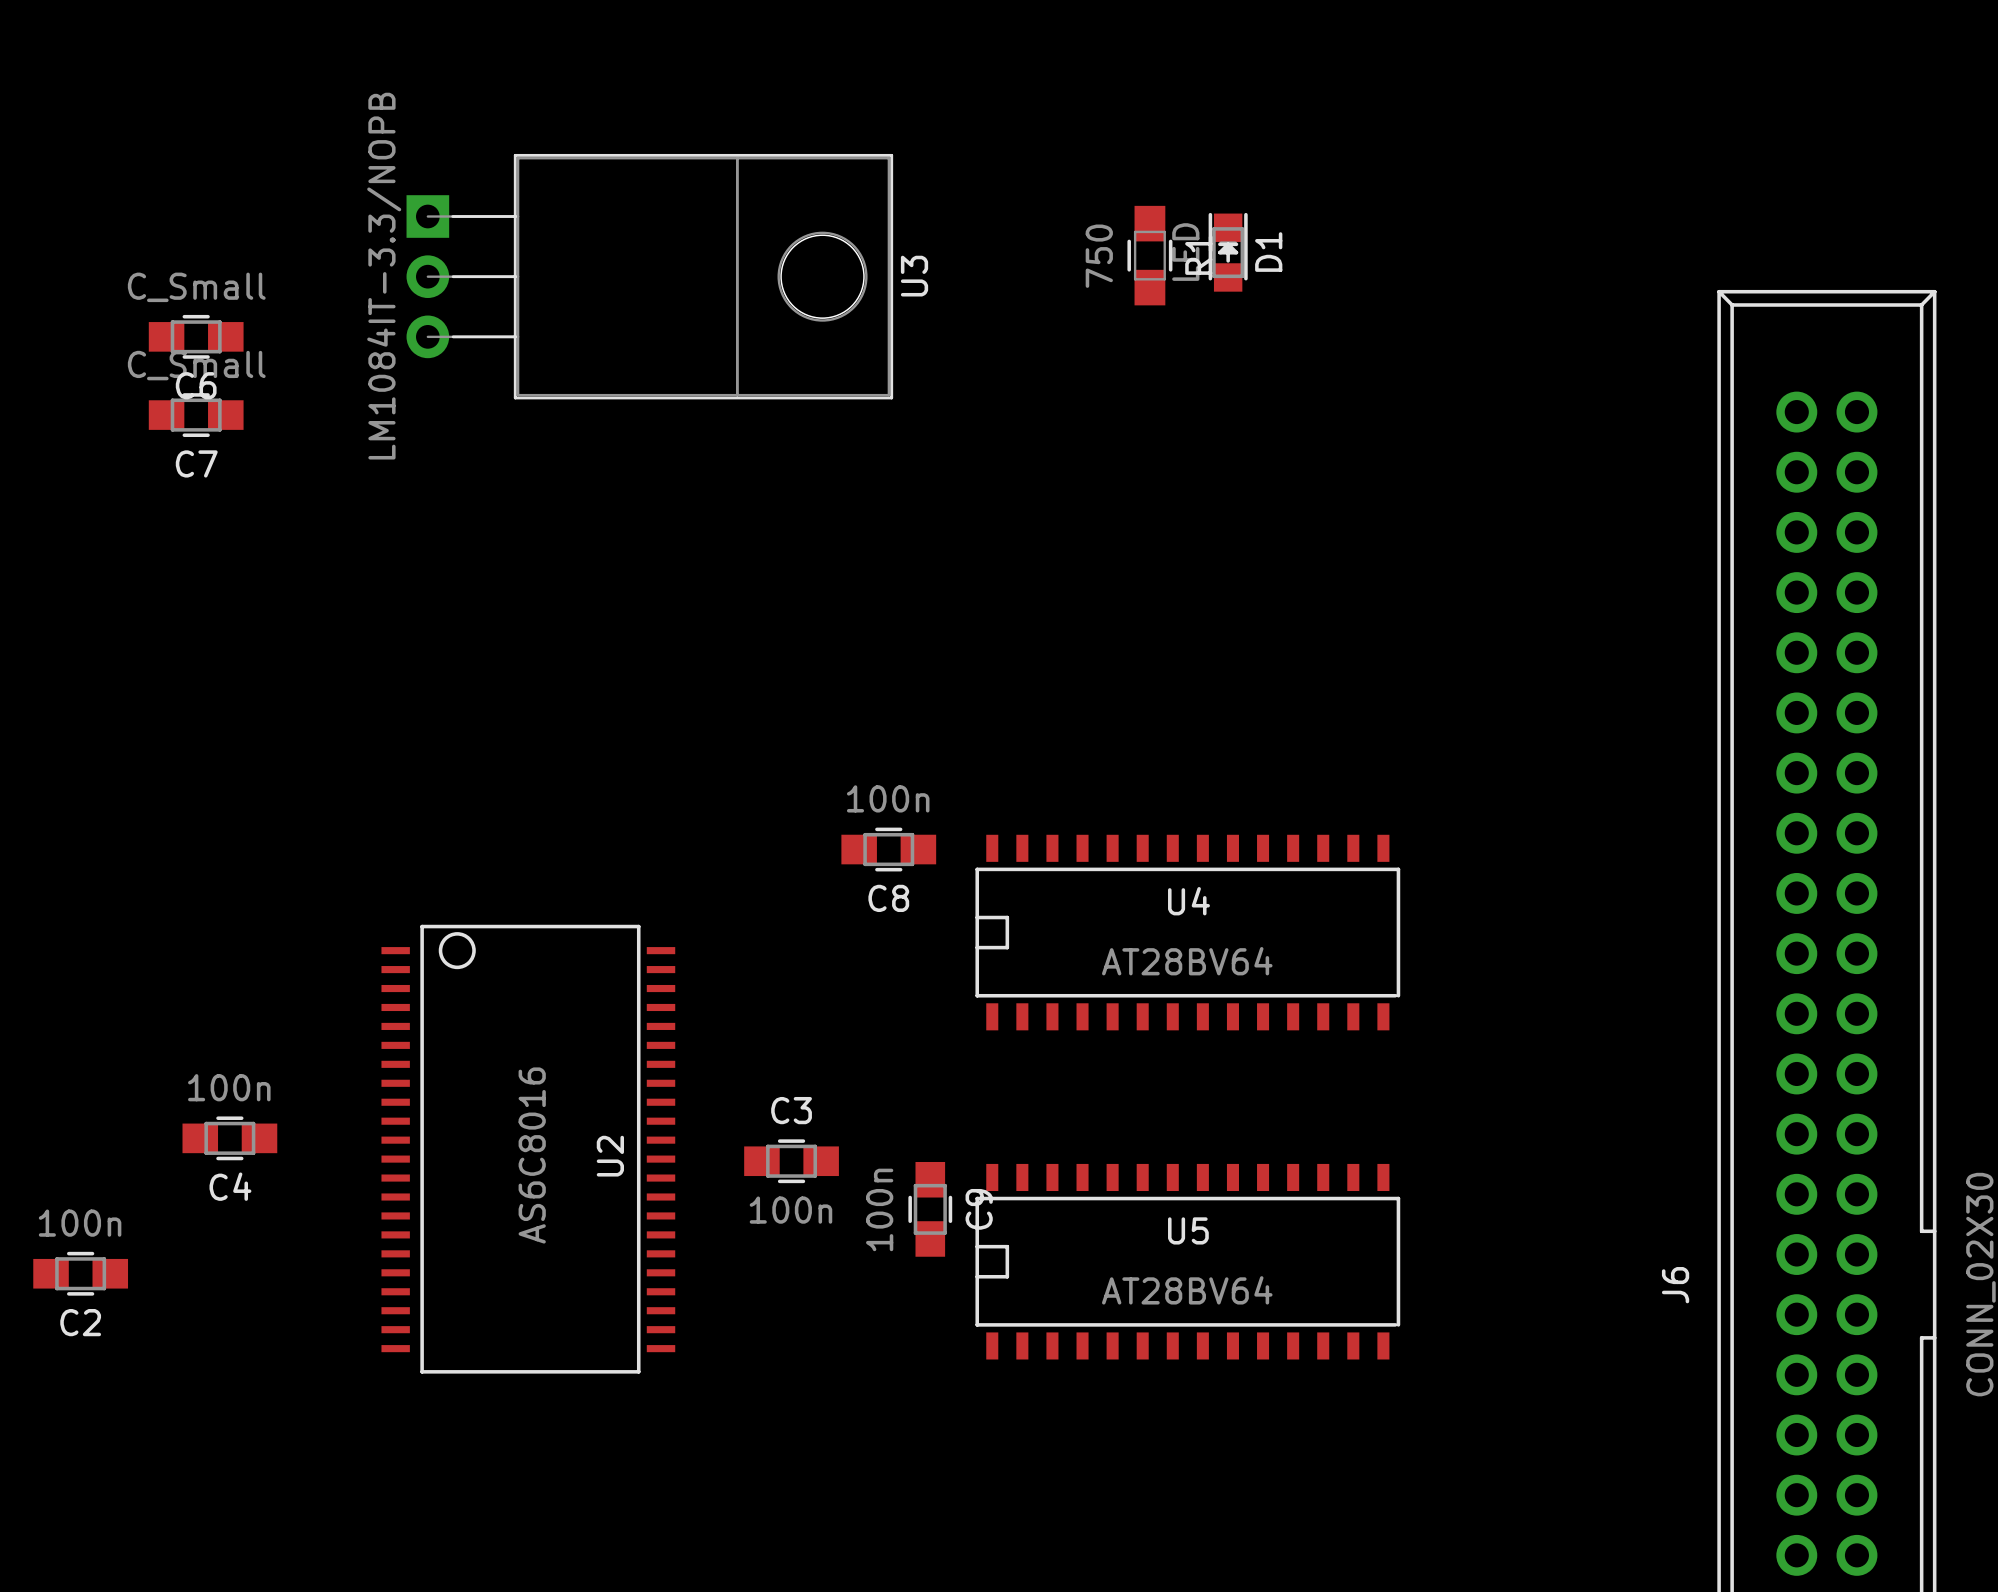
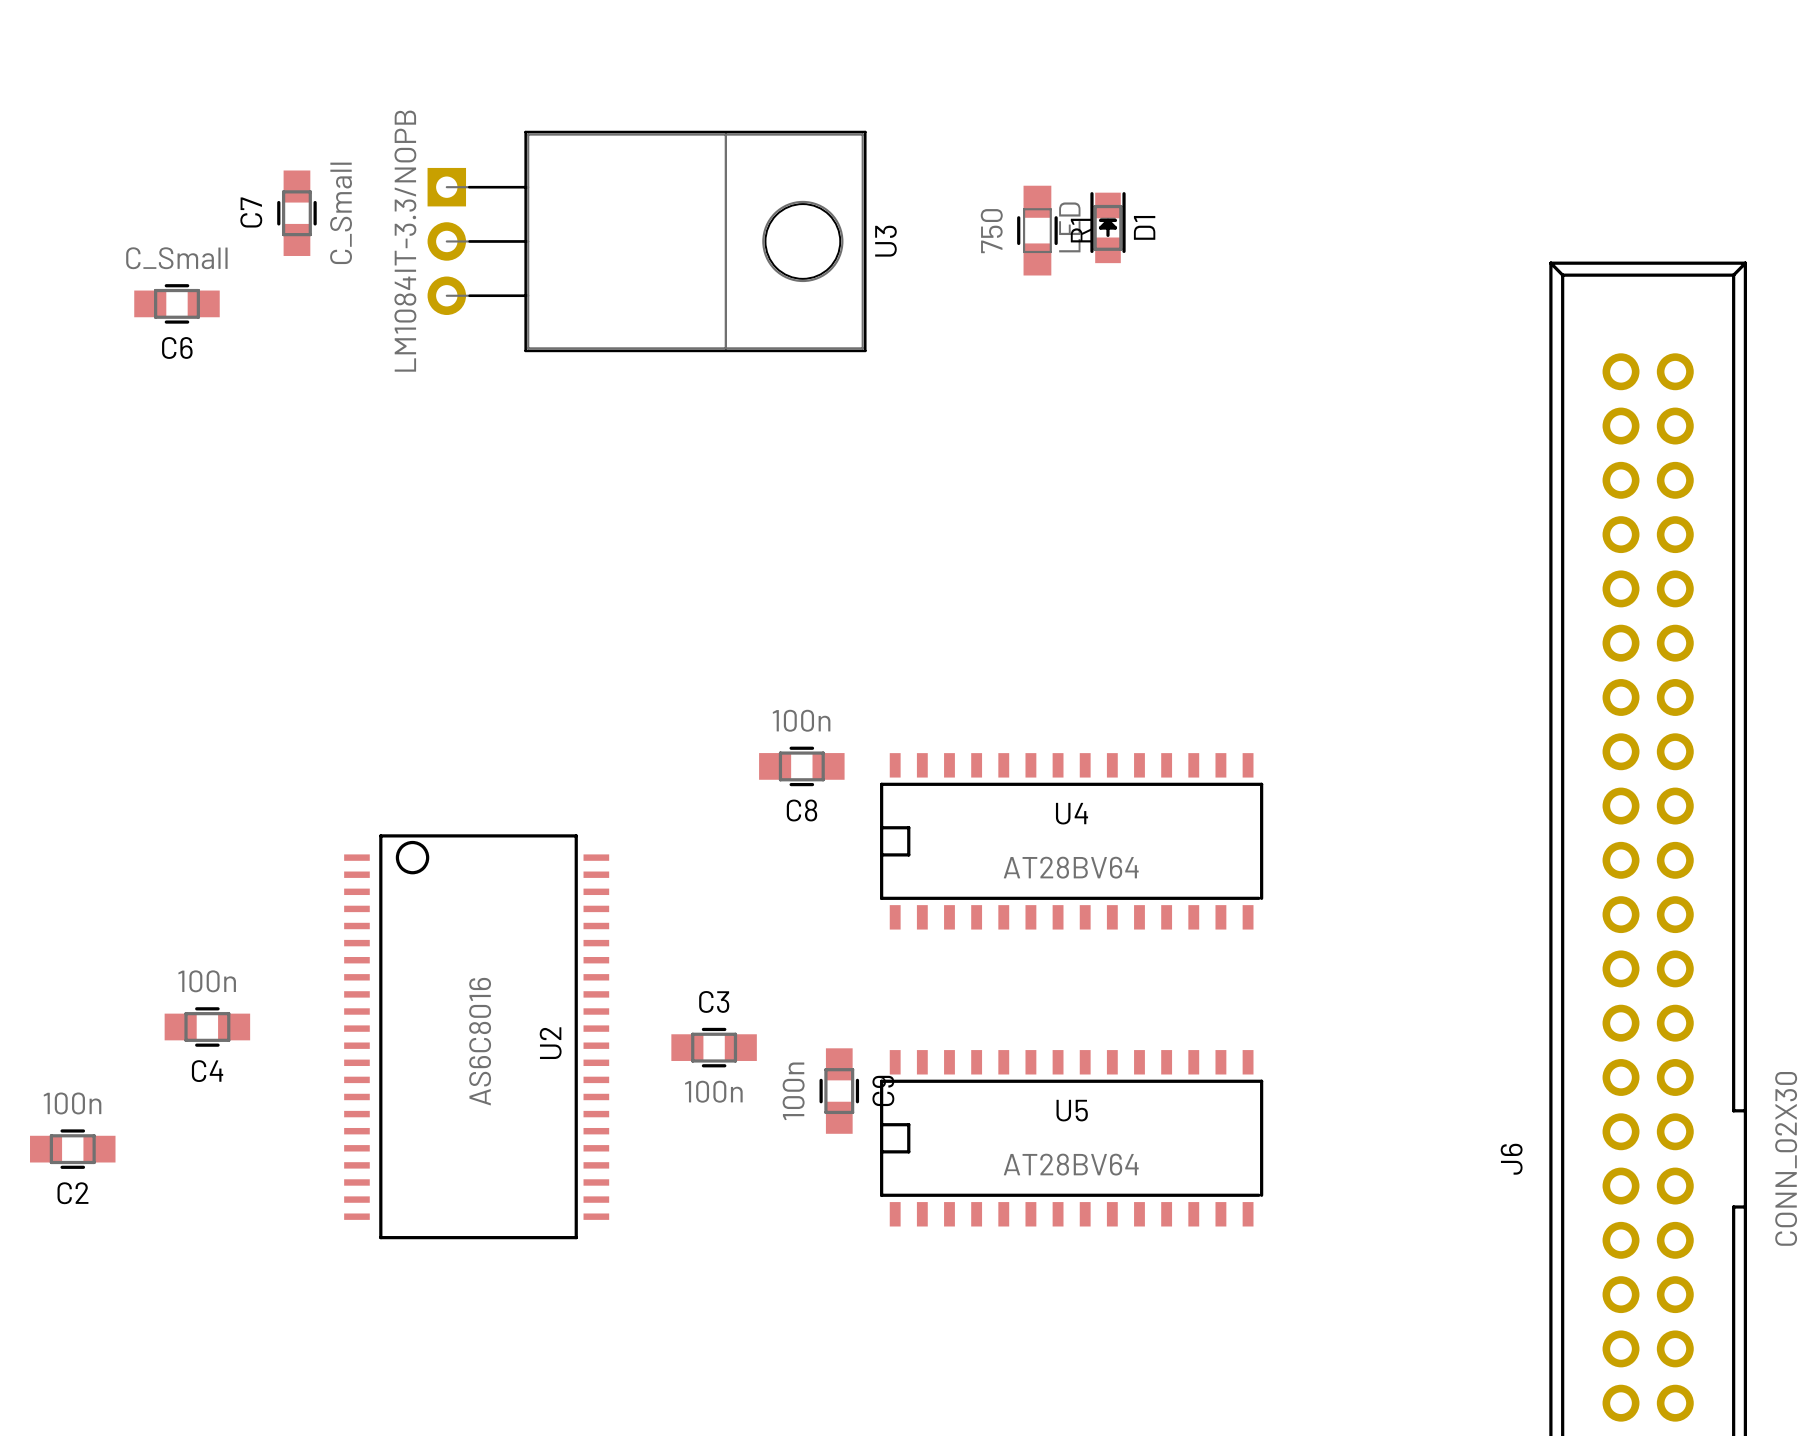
U3 position: (649, 276) -> (647, 241)
C7 rotation: 0° (196, 415) -> 90° clockwise (296, 213)
C7 position: (196, 415) -> (296, 213)

